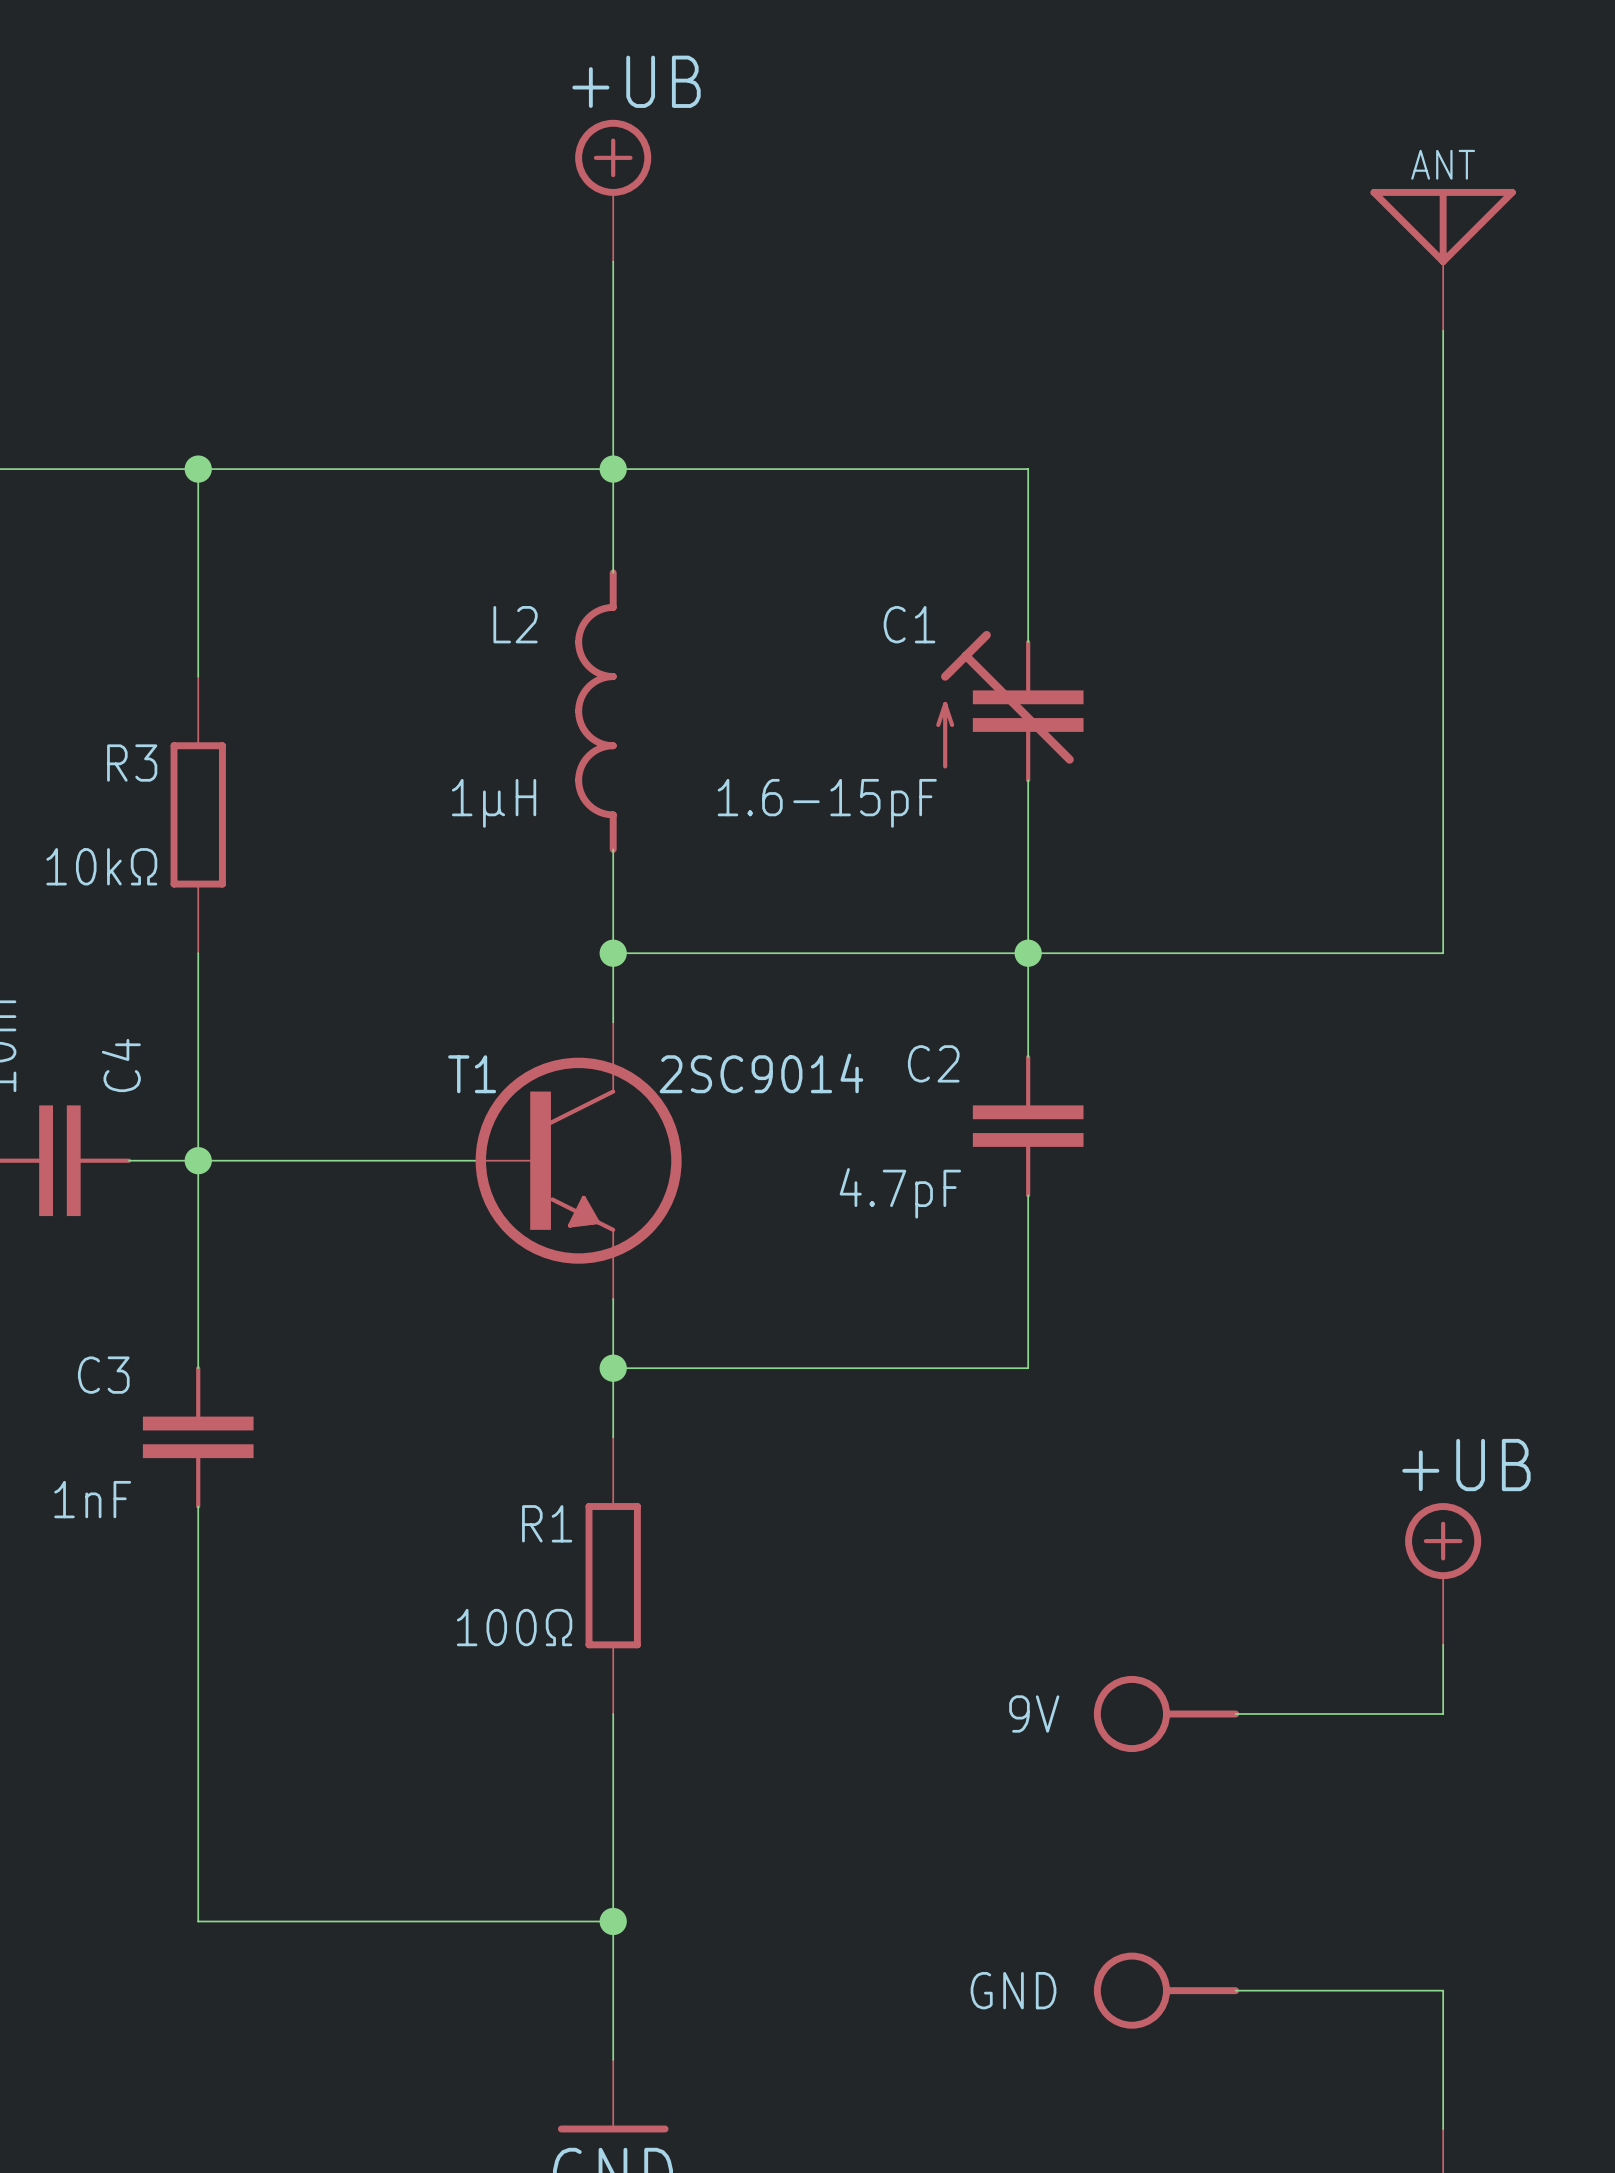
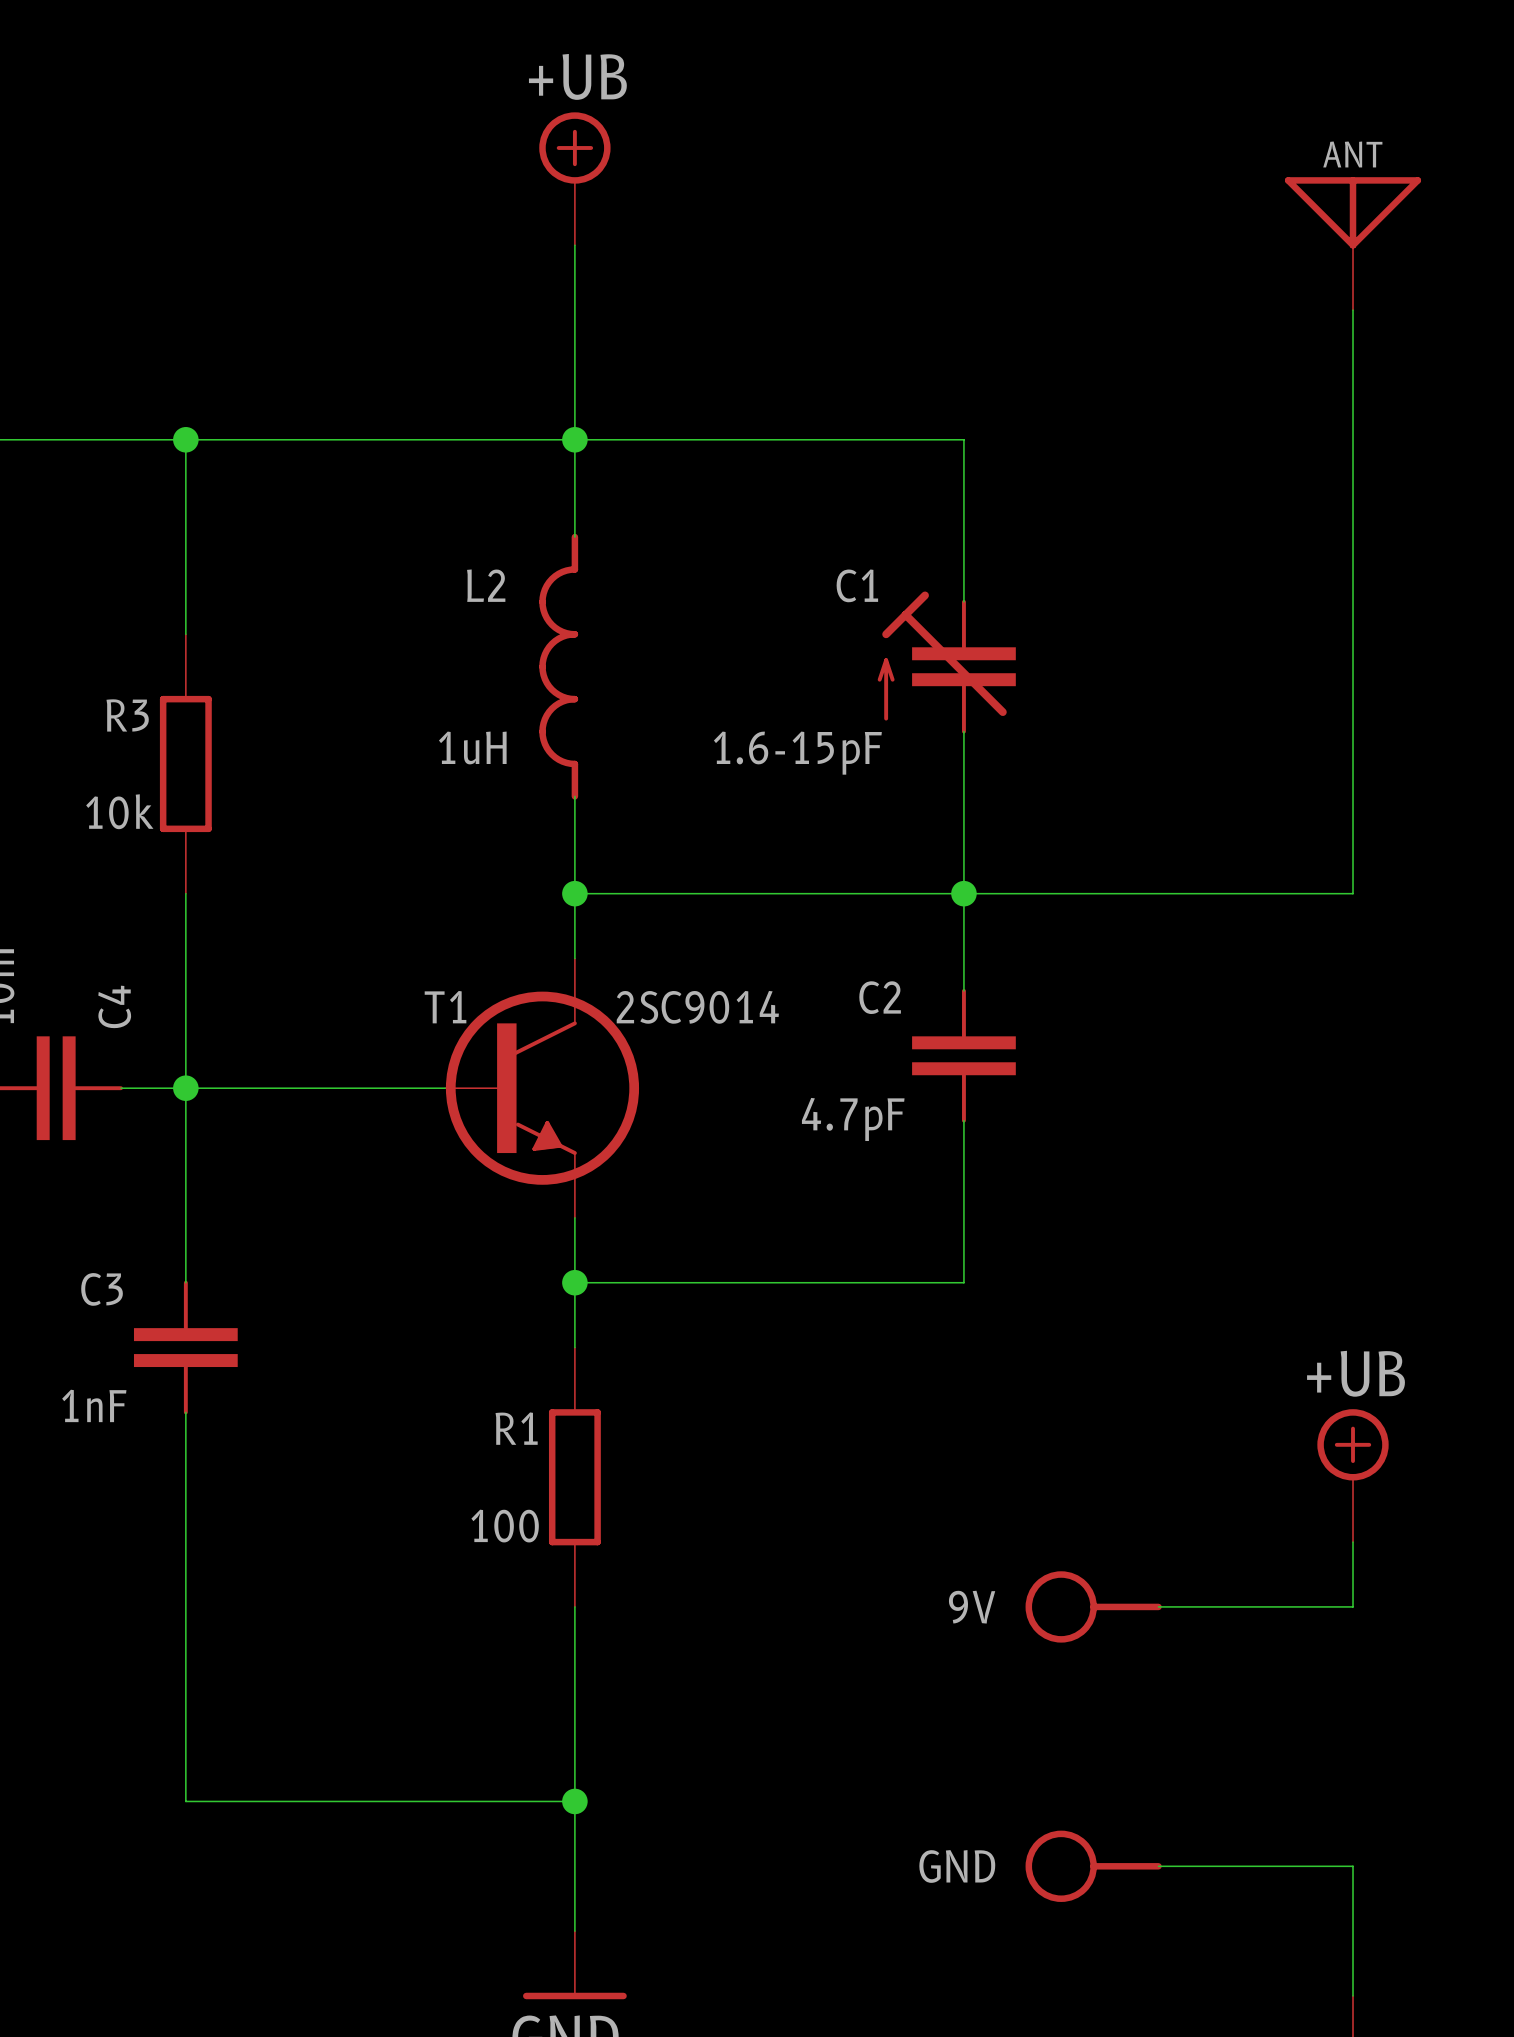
L2 value: 1μH (494, 803) -> 1uH (472, 747)
R3 value: 10kΩ (101, 866) -> 10k (119, 811)
R1 value: 100Ω (514, 1627) -> 100 (505, 1526)

